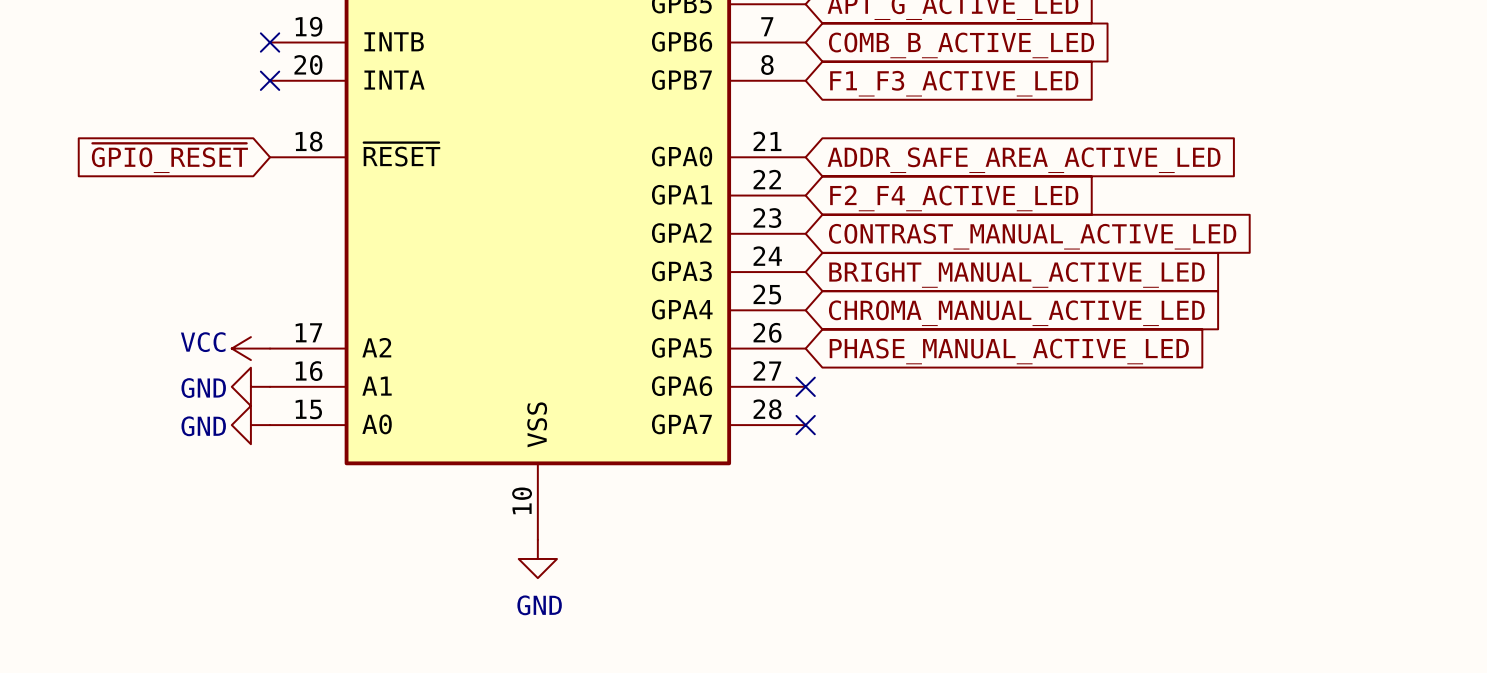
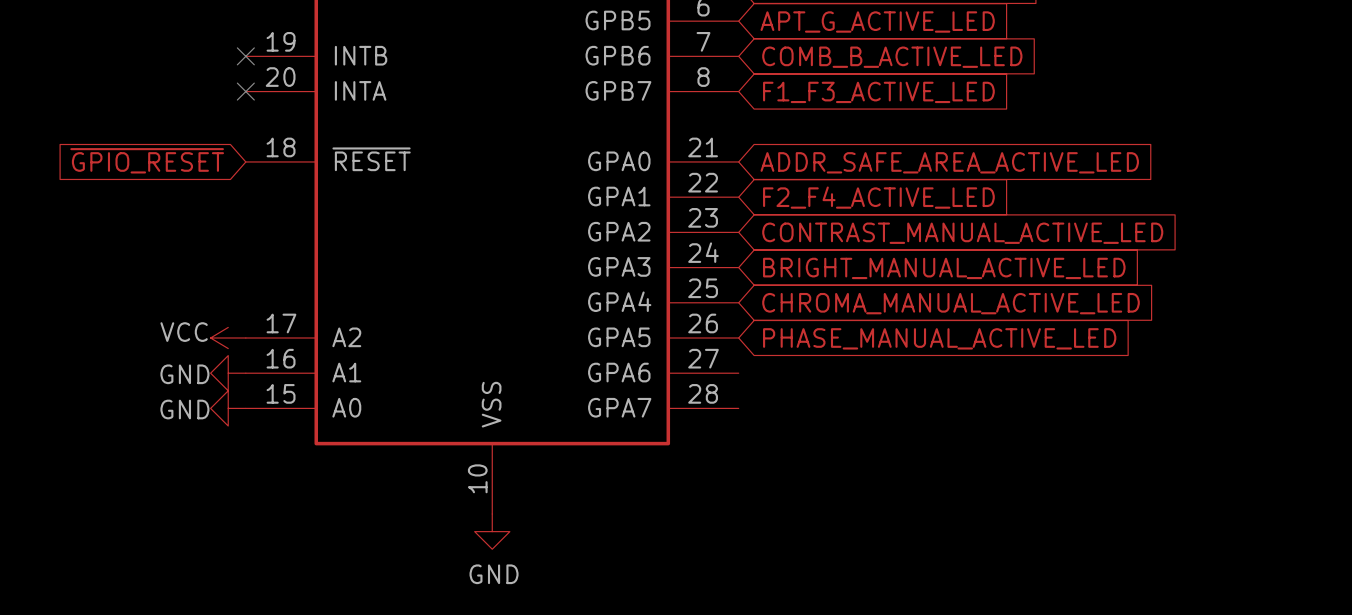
no-connect mark: (805, 386) -> none
no-connect mark: (805, 425) -> none

